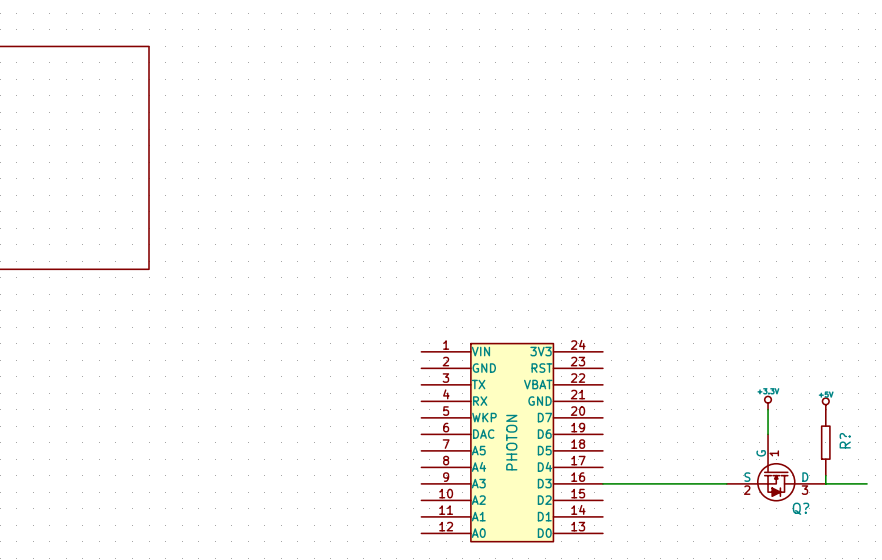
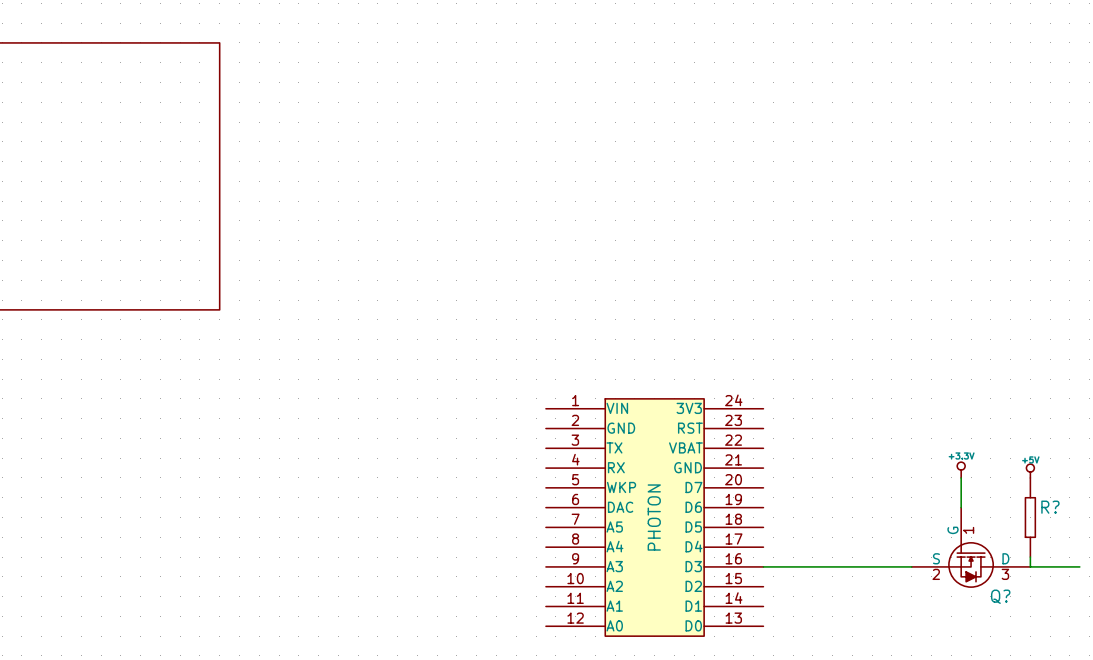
R? name rotation: 0° (845, 440) -> 90° clockwise (1050, 507)

